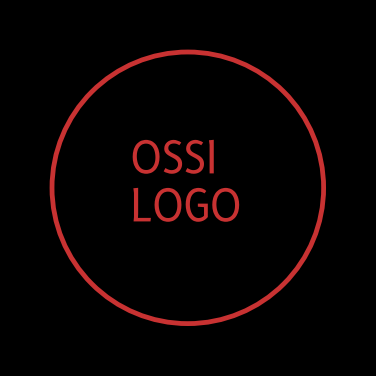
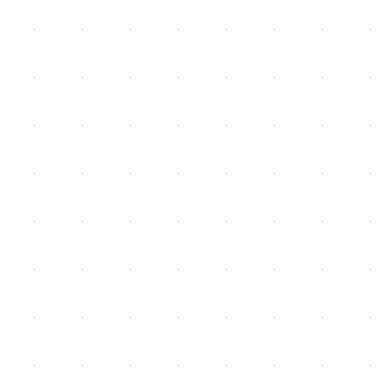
part: (187, 187) -> none

